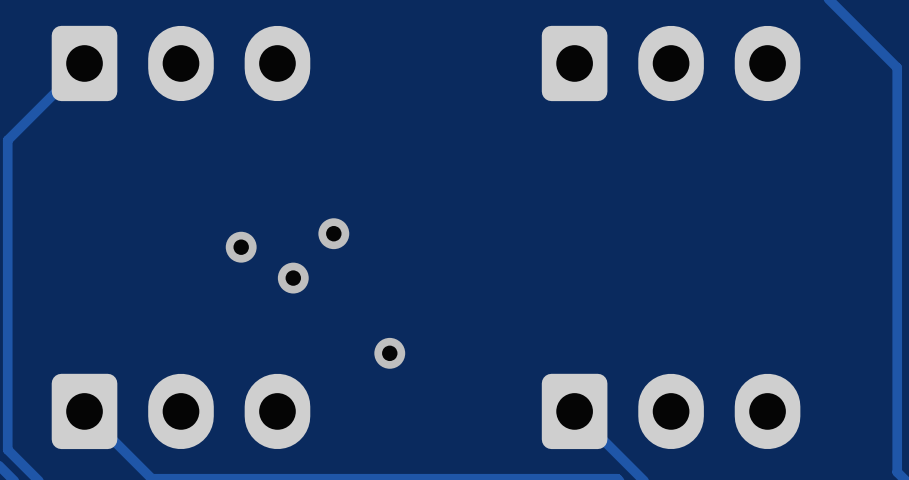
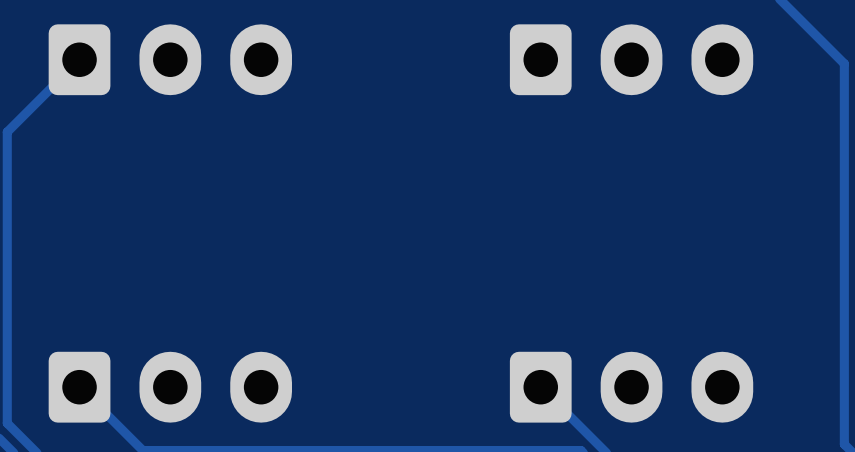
via: (333, 233) -> none
via: (241, 247) -> none
via: (293, 278) -> none
via: (389, 353) -> none

